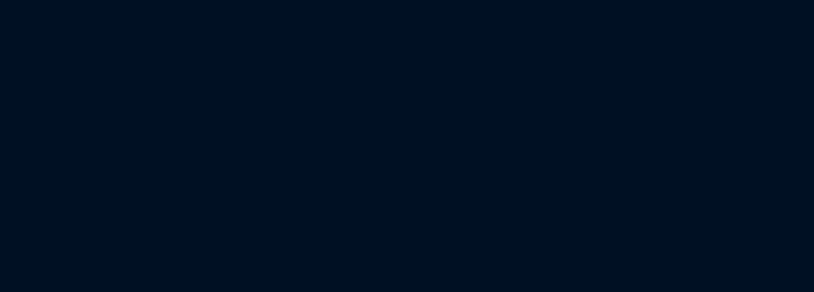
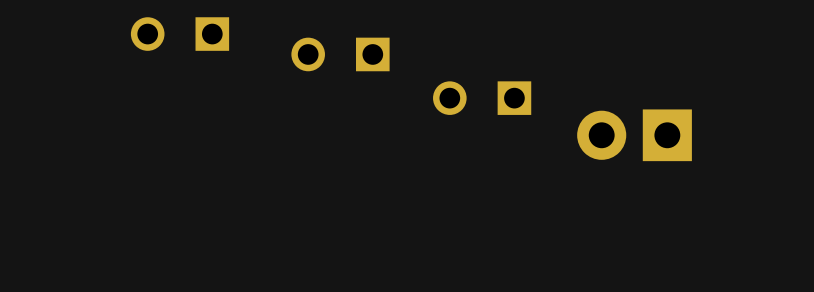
part: none -> (180, 34)
part: none -> (340, 54)
part: none -> (482, 98)
part: none -> (634, 135)

